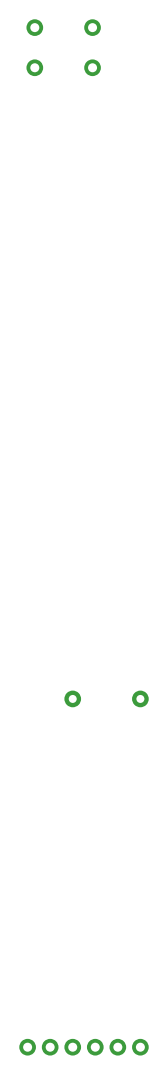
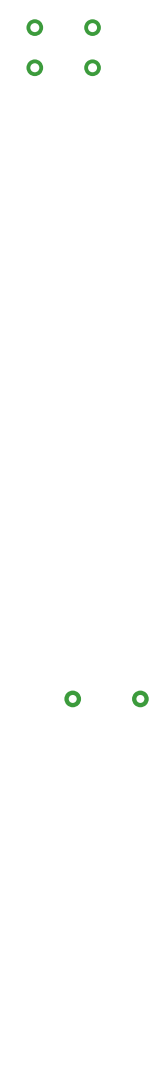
part: (84, 1047) -> none

